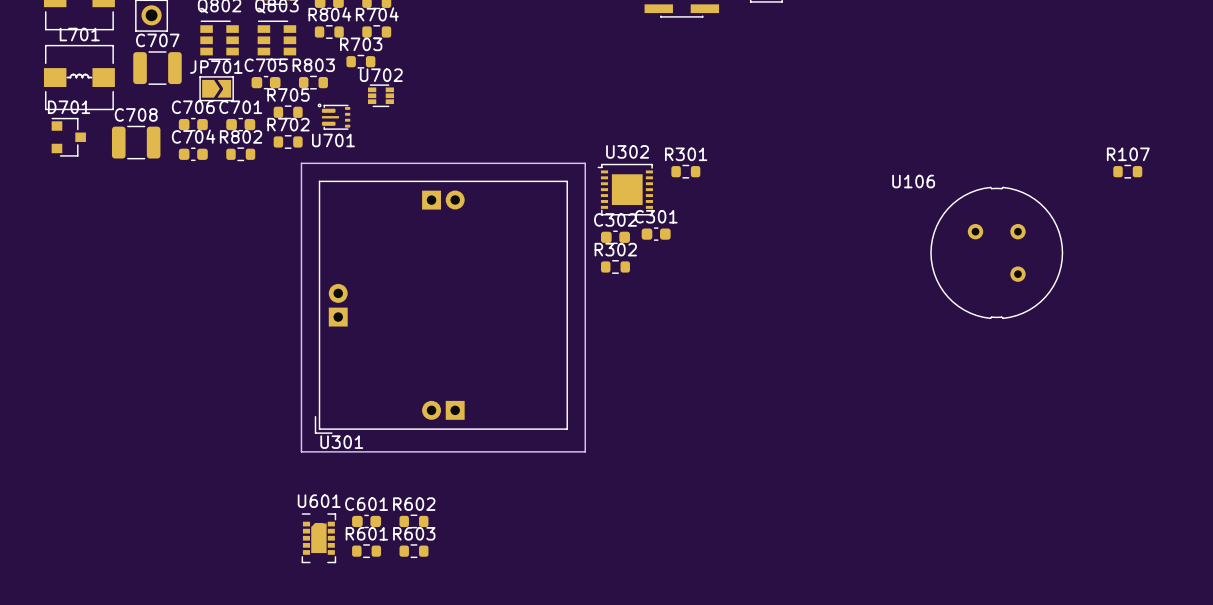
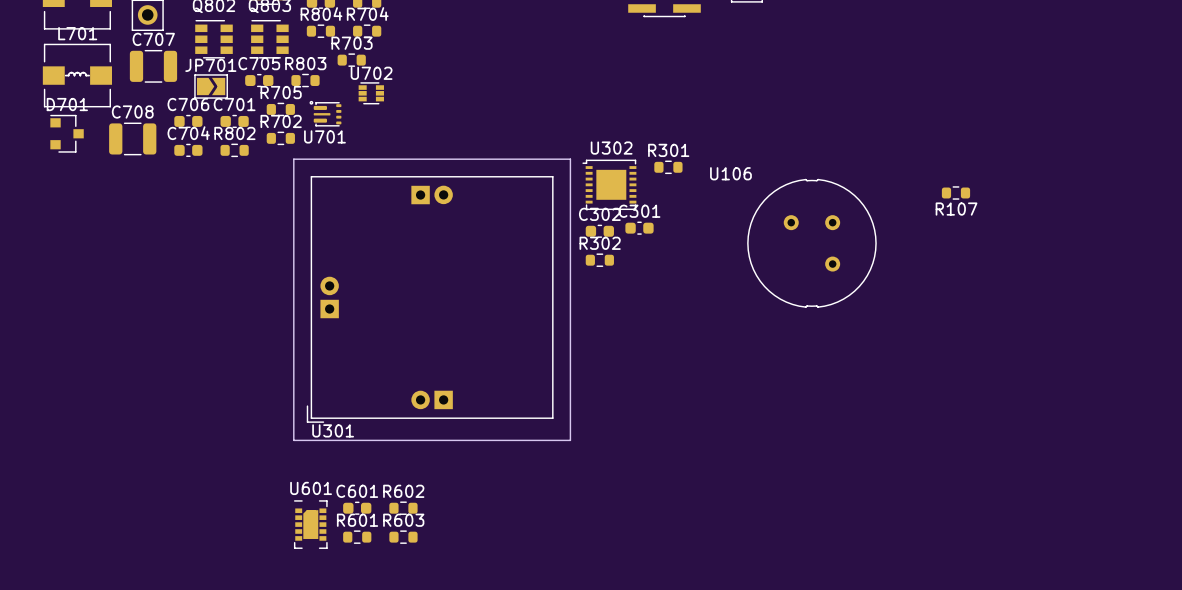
R107 name position: R107 (1128, 154) -> R107 (956, 209)
R107 position: (1127, 171) -> (955, 193)
U106 position: (996, 252) -> (811, 243)

